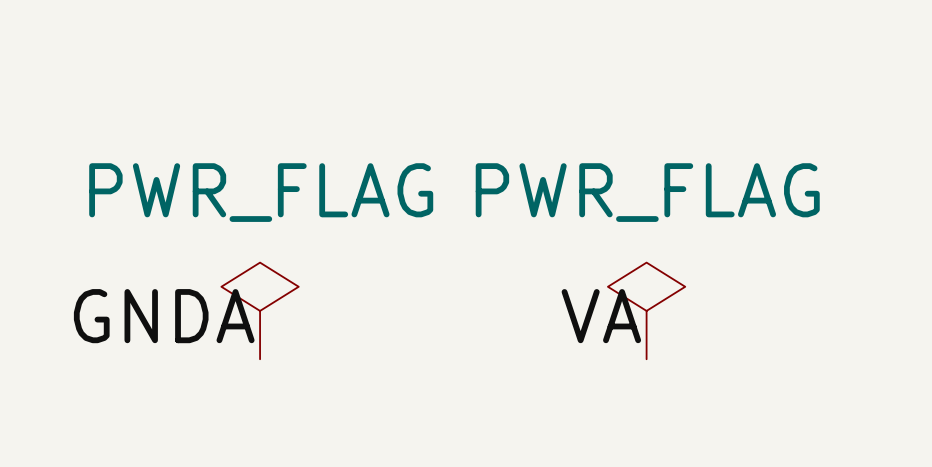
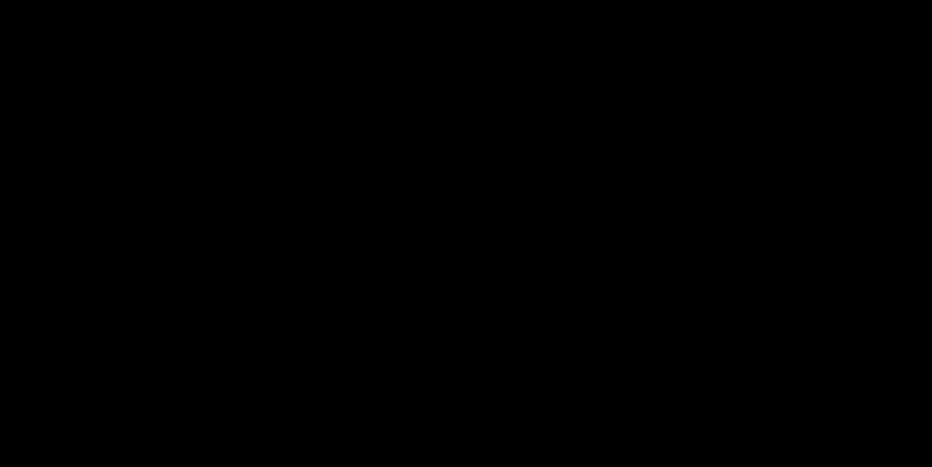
power symbol: PWR_FLAG (260, 310) -> none
power symbol: PWR_FLAG (646, 310) -> none
label: GNDA (164, 316) -> none
label: VA (601, 316) -> none

